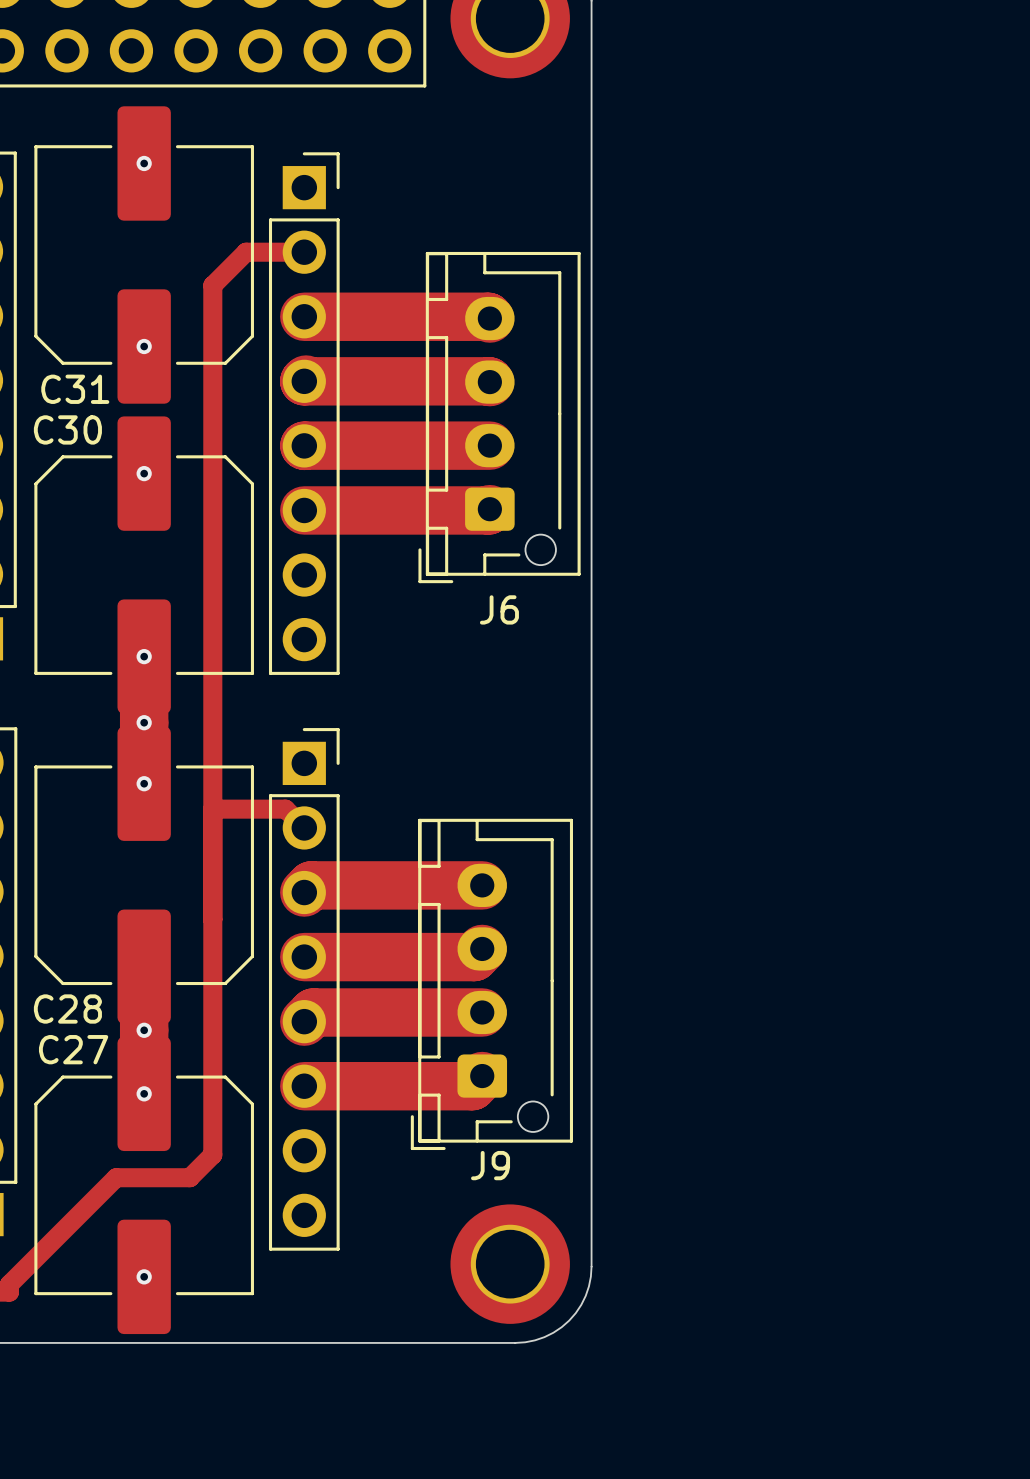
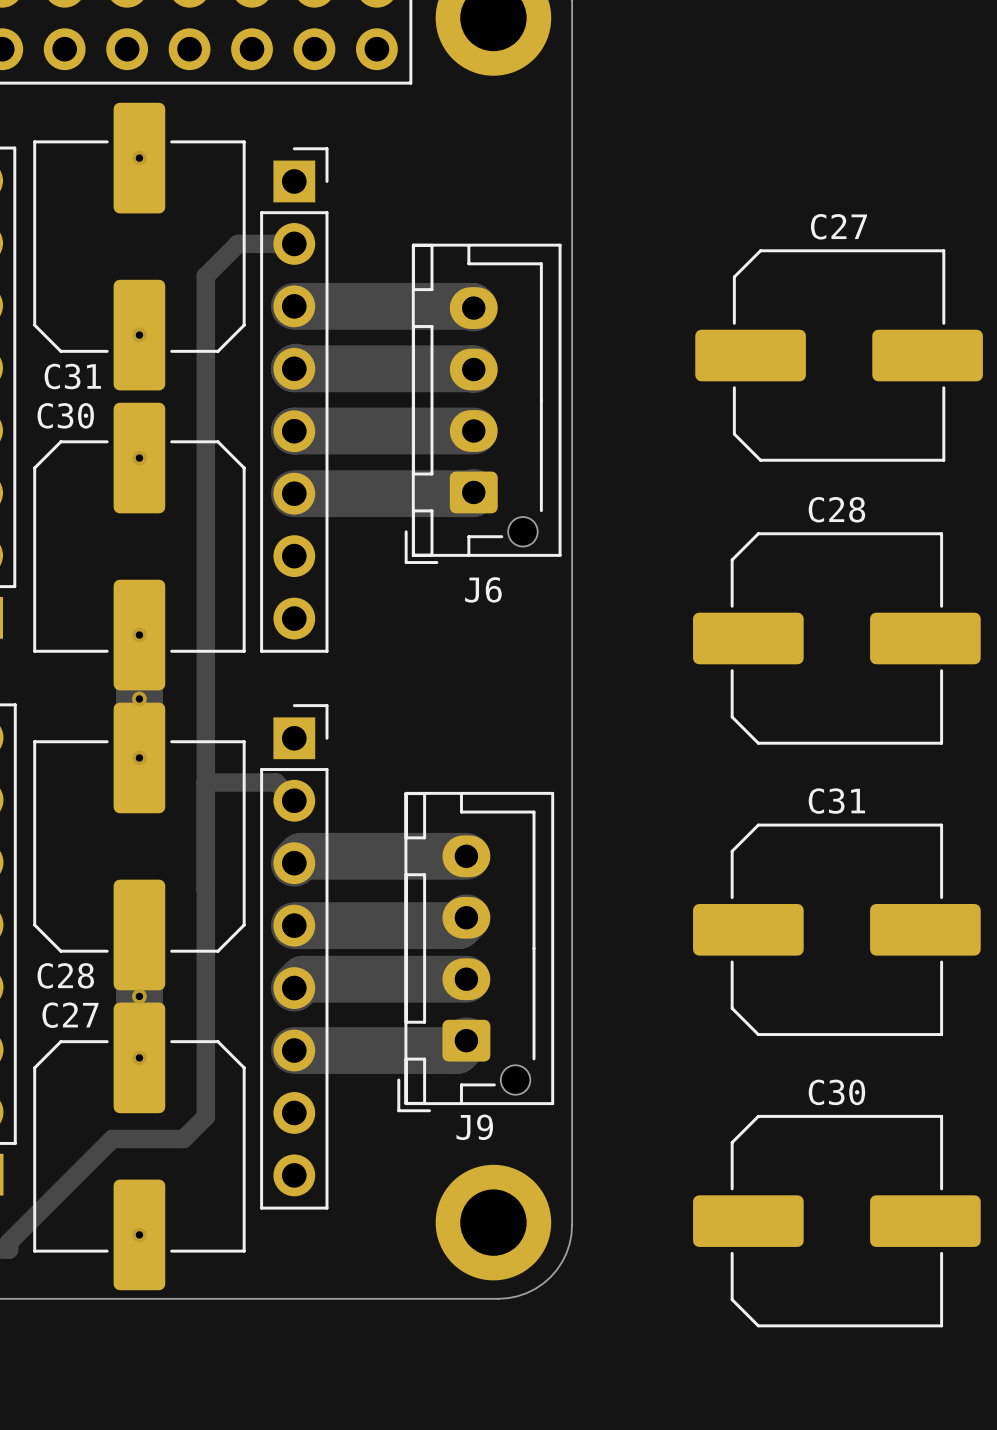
C27: none -> (839, 355)
C28: none -> (836, 638)
C31: none -> (836, 929)
C30: none -> (836, 1221)

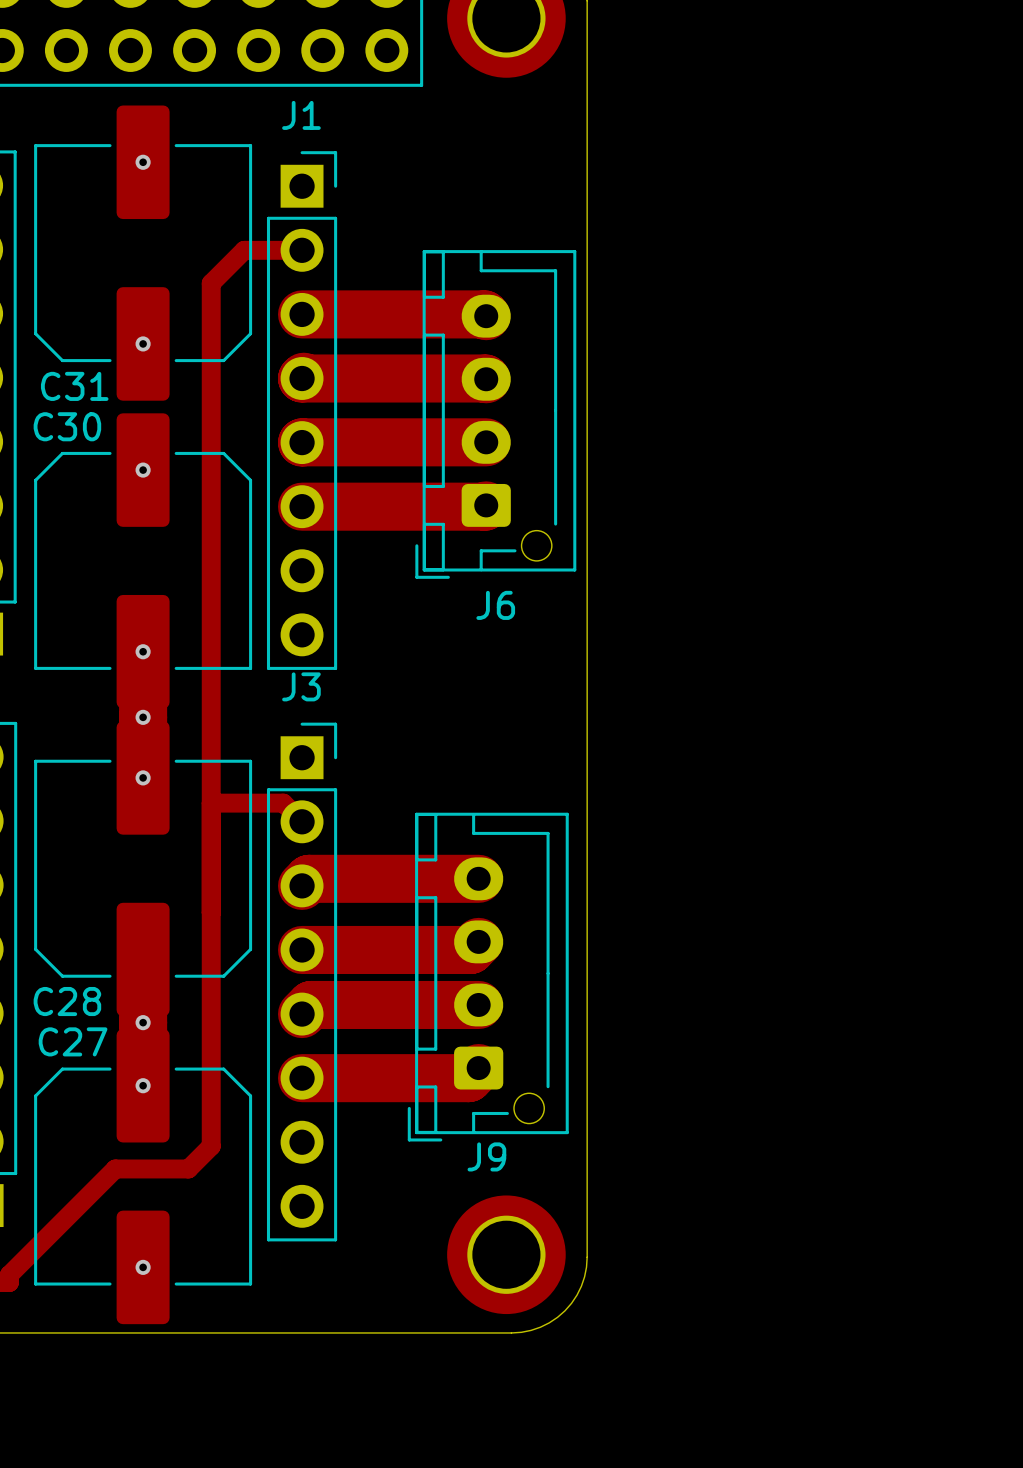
J1 name: none -> J1 (301, 115)
C27: (839, 355) -> none
C28: (836, 638) -> none
J3 name: none -> J3 (301, 686)
C31: (836, 929) -> none
C30: (836, 1221) -> none

